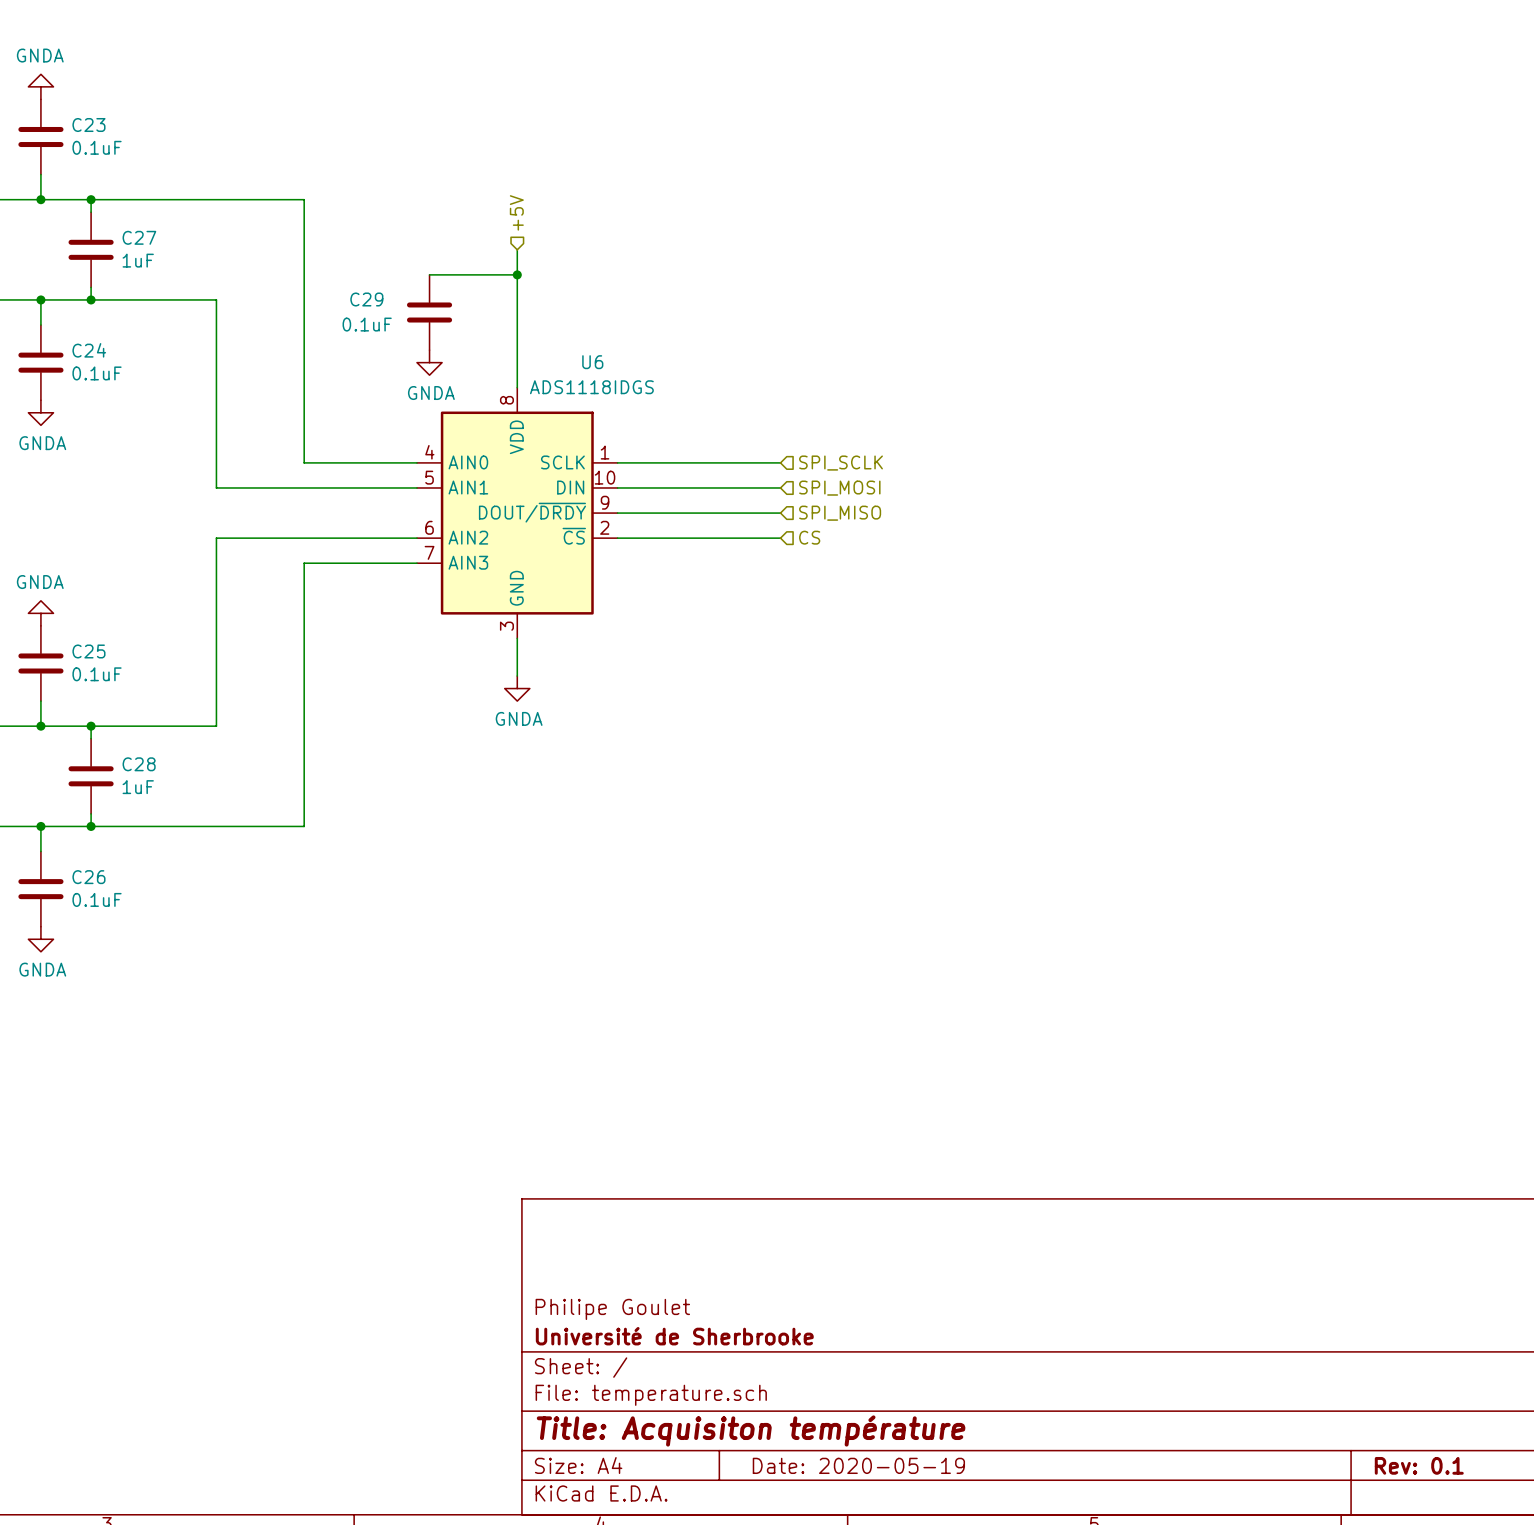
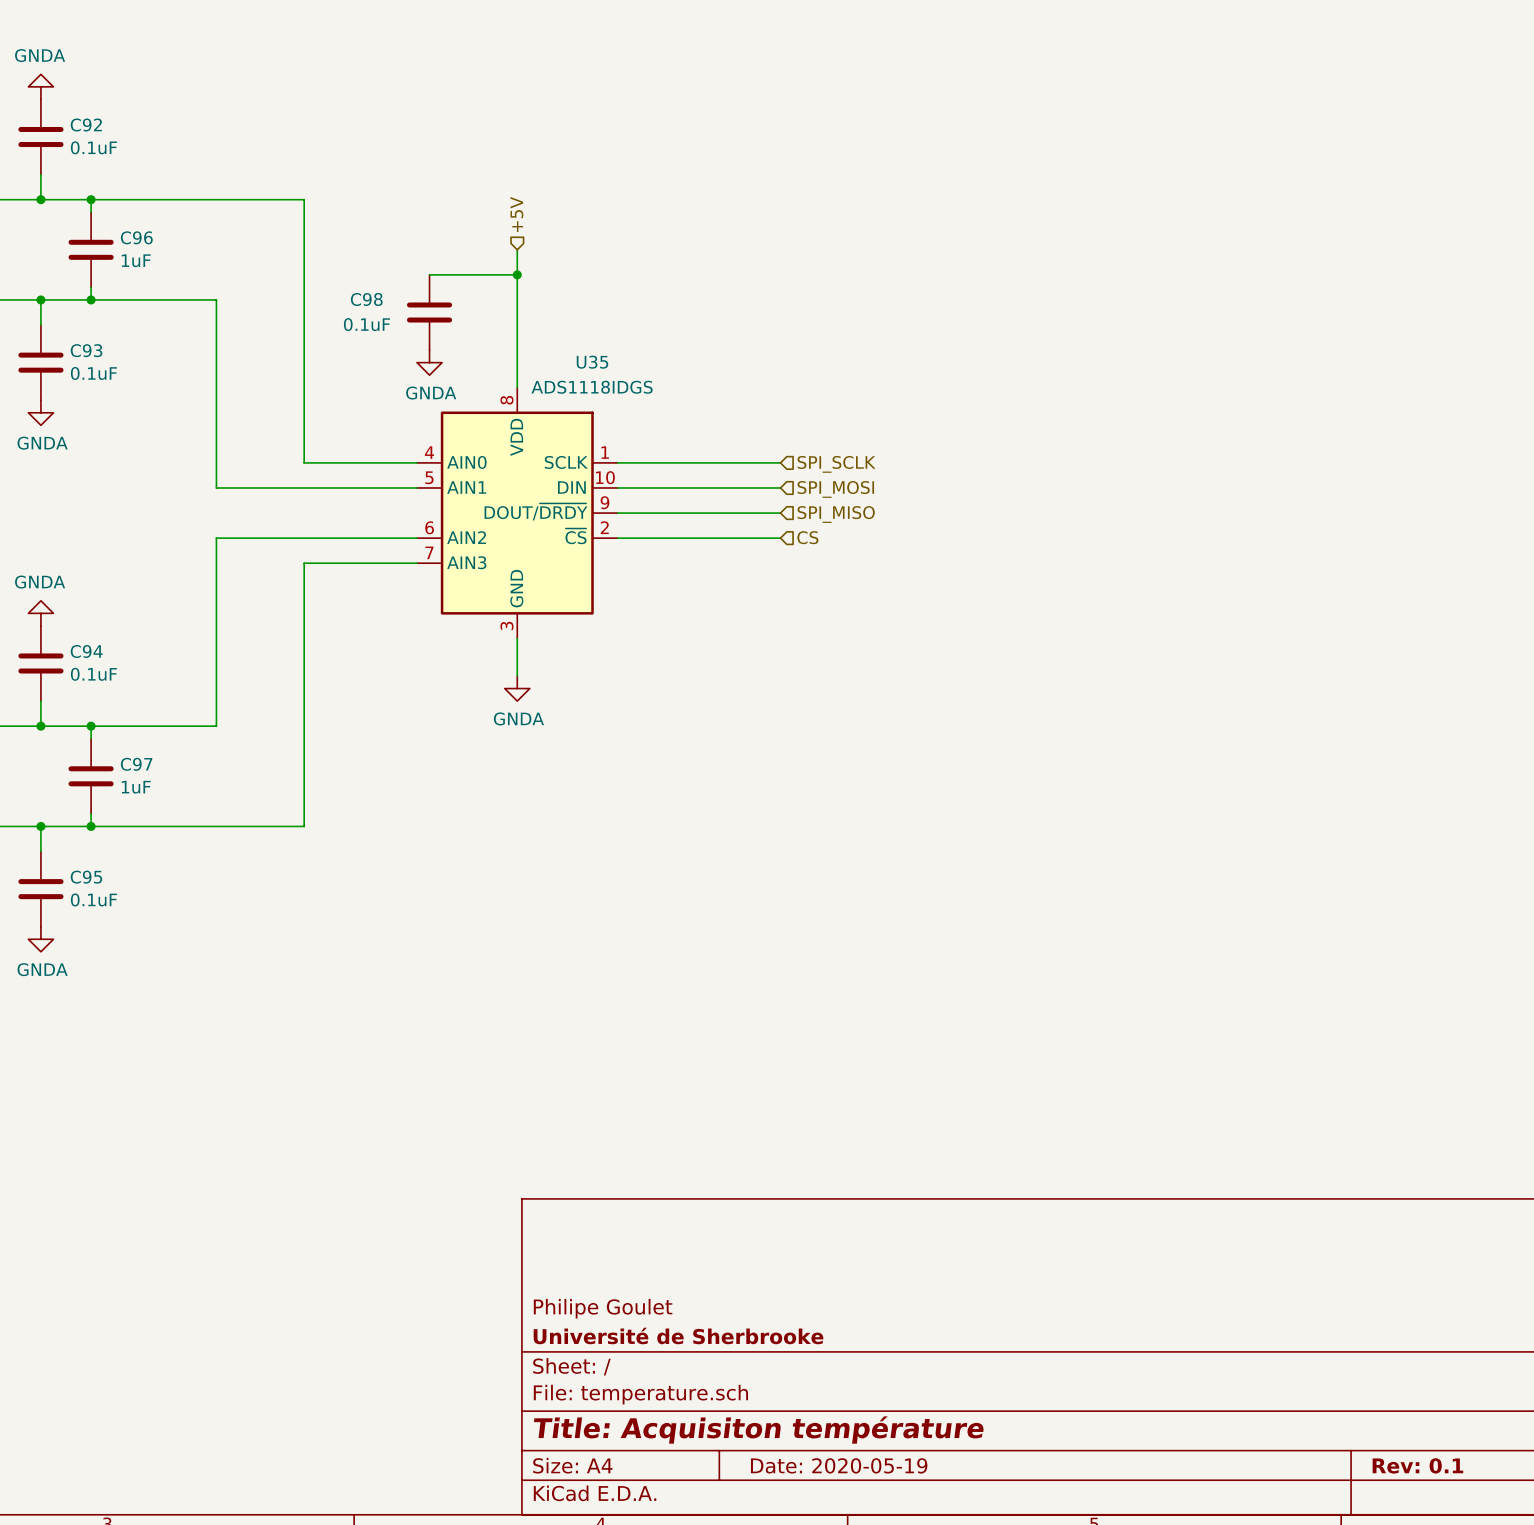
C23 name: C23 (88, 125) -> C92 (86, 125)
C27 name: C27 (139, 237) -> C96 (136, 237)
C29 name: C29 (366, 299) -> C98 (366, 299)
C24 name: C24 (89, 350) -> C93 (86, 350)
U6 name: U6 (592, 362) -> U35 (592, 362)
C25 name: C25 (88, 651) -> C94 (86, 651)
C28 name: C28 (139, 764) -> C97 (136, 764)
C26 name: C26 (88, 877) -> C95 (86, 877)

